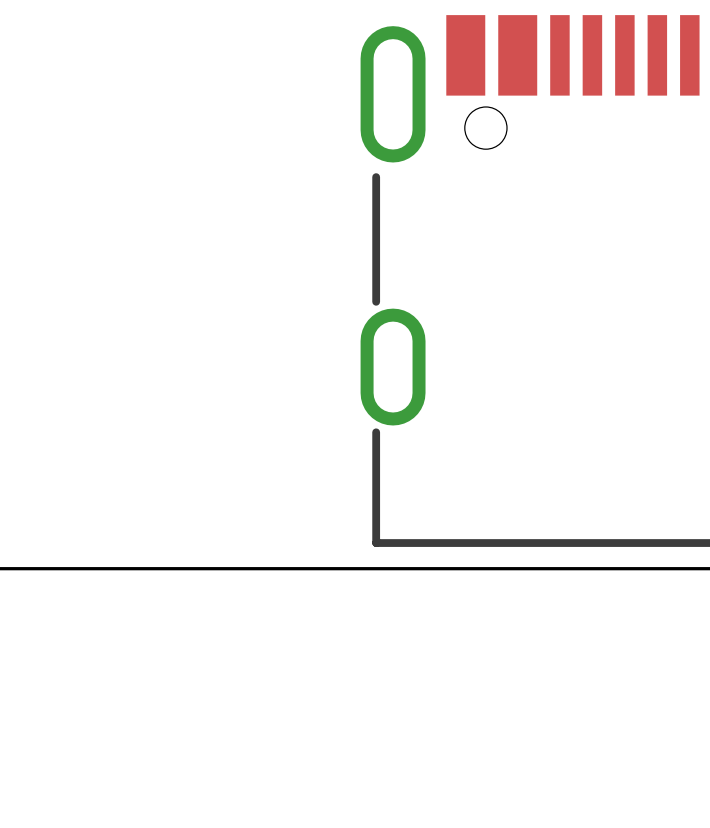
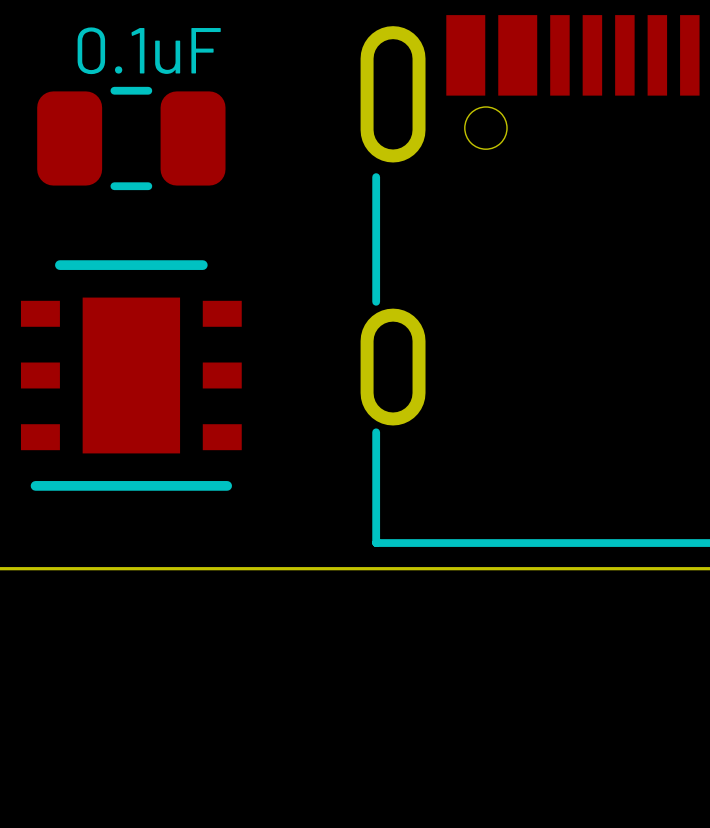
part: none -> 0.1uF (131, 138)
part: none -> (131, 375)

